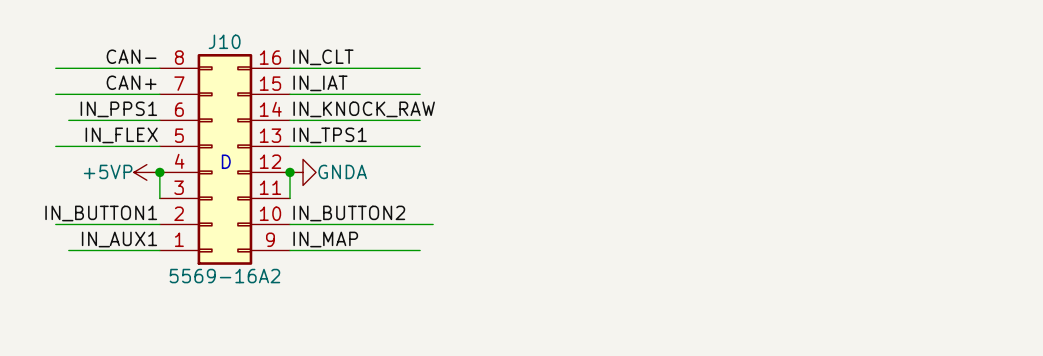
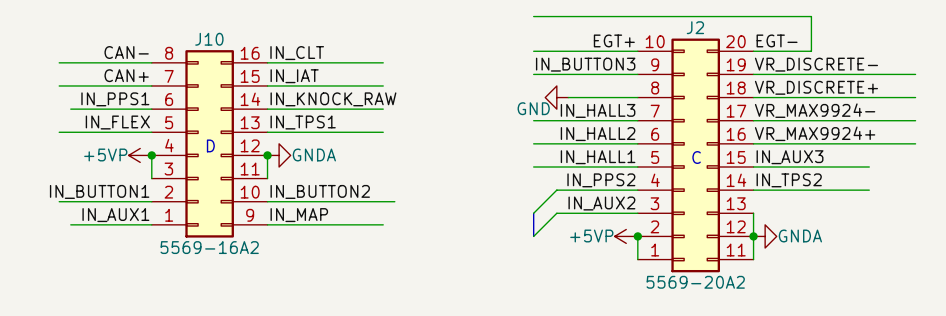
wire: none -> (533, 16) (811, 16) (811, 51) (753, 51)
label: none -> EGT+ (614, 40)
label: none -> EGT- (777, 40)
wire: none -> (533, 51) (637, 51)
label: none -> IN_BUTTON3 (585, 64)
label: none -> VR_DISCRETE- (816, 64)
wire: none -> (533, 74) (637, 74)
wire: none -> (753, 74) (915, 74)
label: none -> VR_DISCRETE+ (816, 87)
power symbol: none -> GND (556, 97)
wire: none -> (568, 97) (637, 97)
wire: none -> (753, 97) (915, 97)
label: none -> IN_HALL3 (598, 110)
label: none -> VR_MAX9924- (815, 110)
wire: none -> (533, 120) (637, 120)
wire: none -> (753, 120) (915, 120)
label: none -> IN_HALL2 (598, 134)
label: none -> VR_MAX9924+ (815, 133)
wire: none -> (533, 143) (637, 143)
wire: none -> (753, 143) (915, 143)
J2: none -> 5569-20A2 (695, 155)
label: none -> IN_HALL1 (598, 157)
text: none -> C (696, 157)
label: none -> IN_AUX3 (790, 157)
wire: none -> (533, 166) (637, 166)
wire: none -> (753, 166) (869, 166)
label: none -> IN_PPS2 (601, 180)
label: none -> IN_TPS2 (789, 180)
wire: none -> (637, 190) (556, 190) (533, 213)
wire: none -> (753, 190) (869, 190)
label: none -> IN_AUX2 (601, 203)
bus: none -> (533, 213) (533, 236)
wire: none -> (637, 213) (556, 213) (533, 236)
wire: none -> (753, 213) (753, 259)
power symbol: none -> +5VP (626, 236)
wire: none -> (637, 236) (637, 259)
junction: none -> (637, 236)
junction: none -> (753, 236)
power symbol: none -> GNDA (765, 236)

